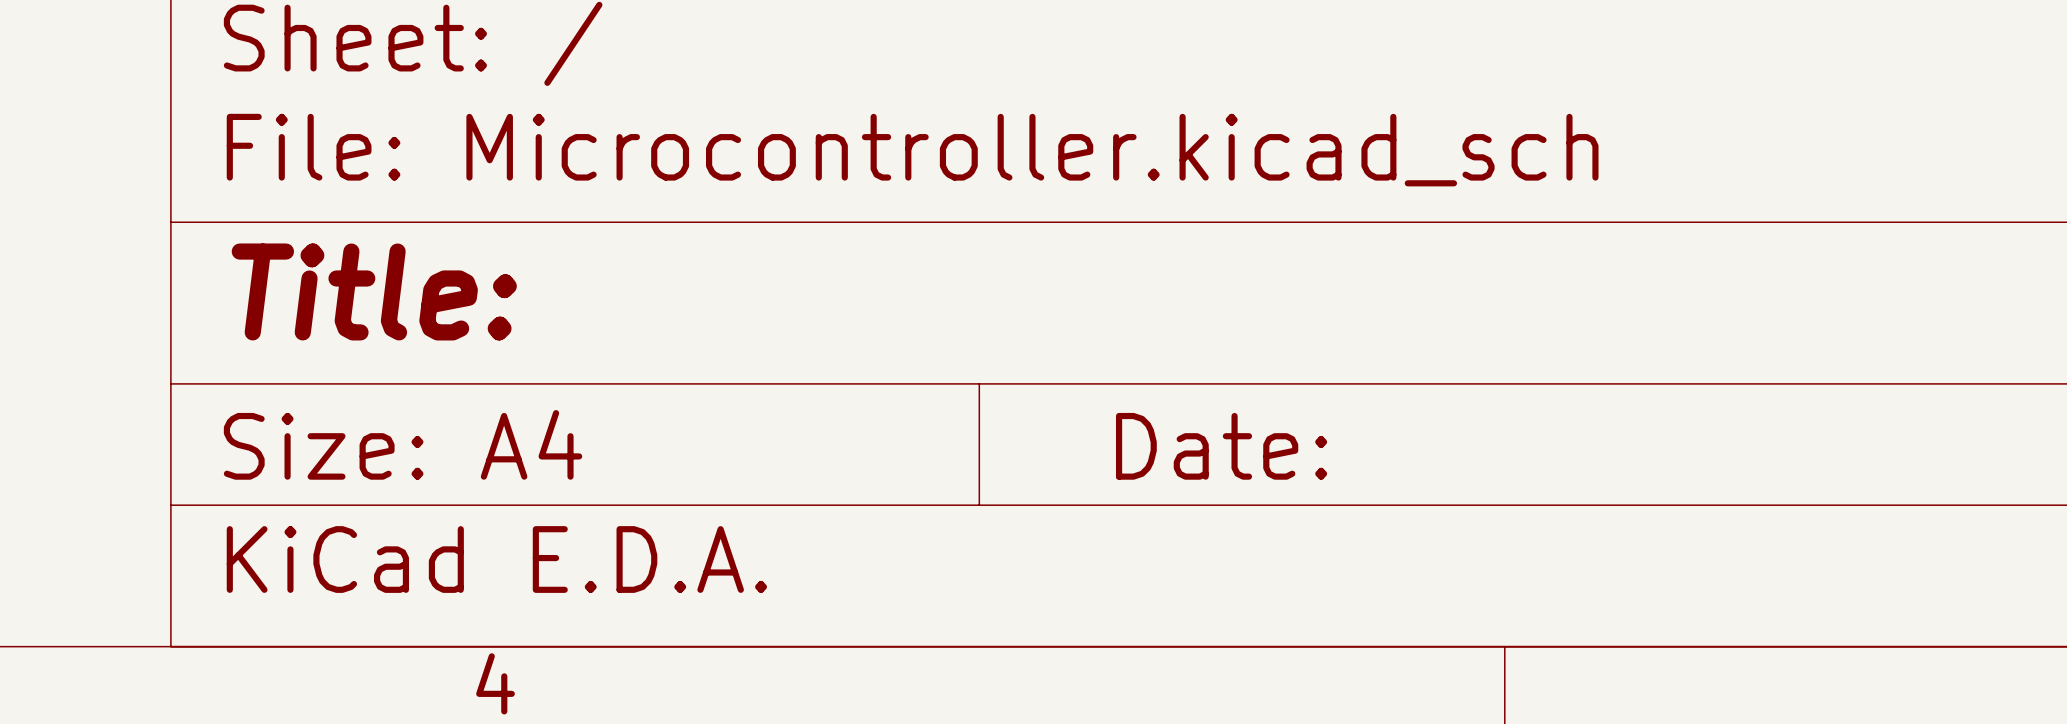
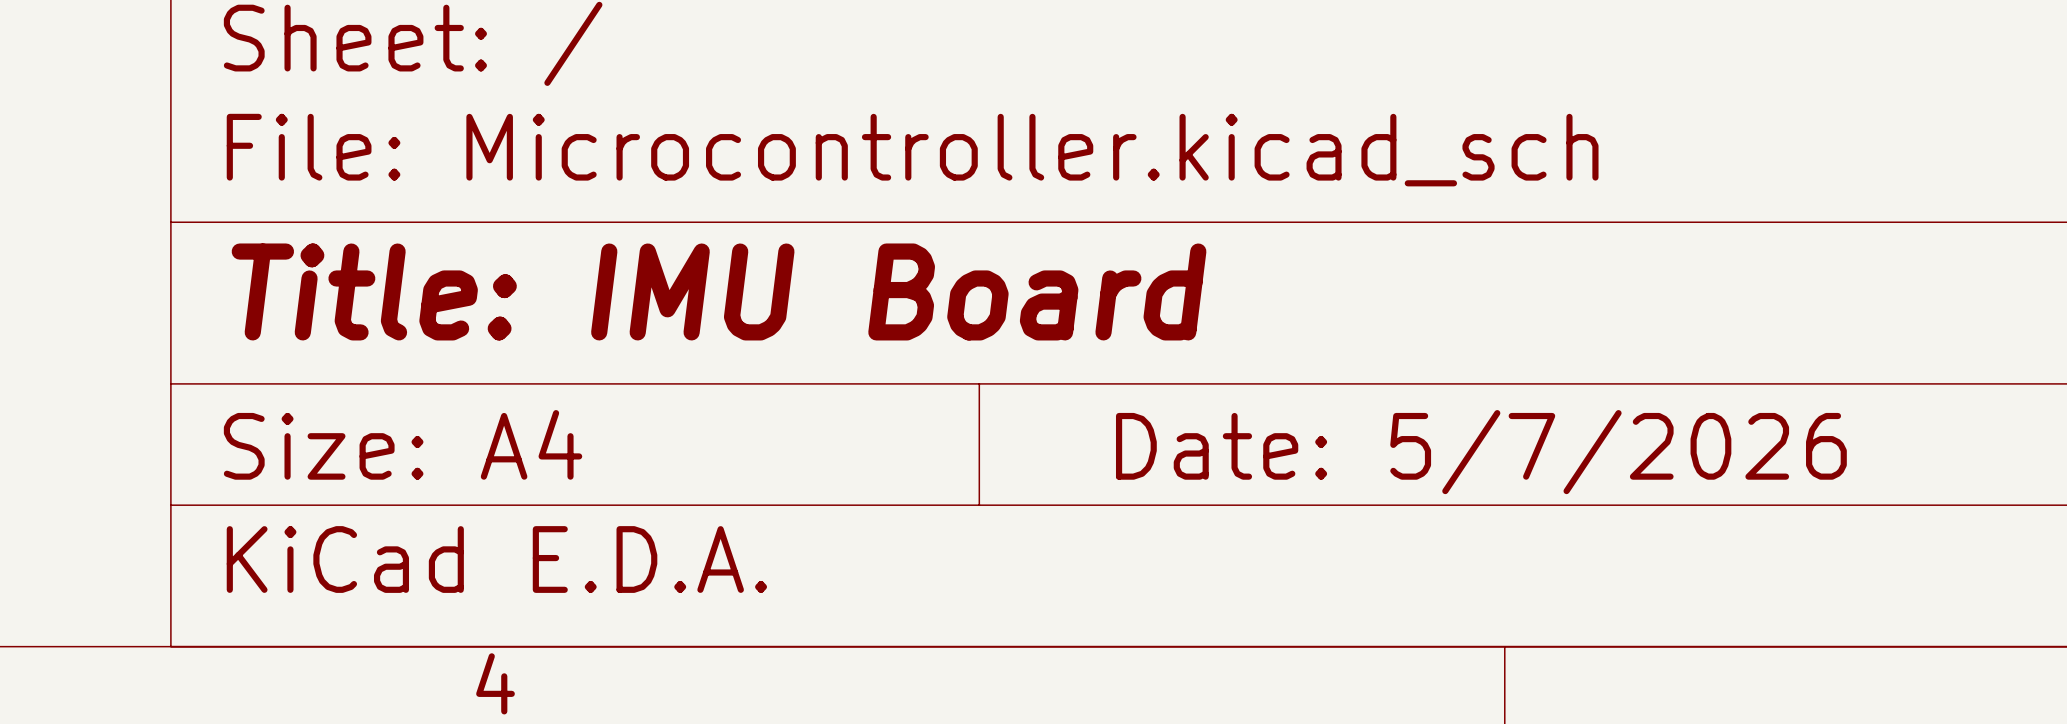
title block: Title: (374, 291) -> Title: IMU Board (719, 291)
title block: Date: (1221, 446) -> Date: 5/7/2026 (1481, 452)

